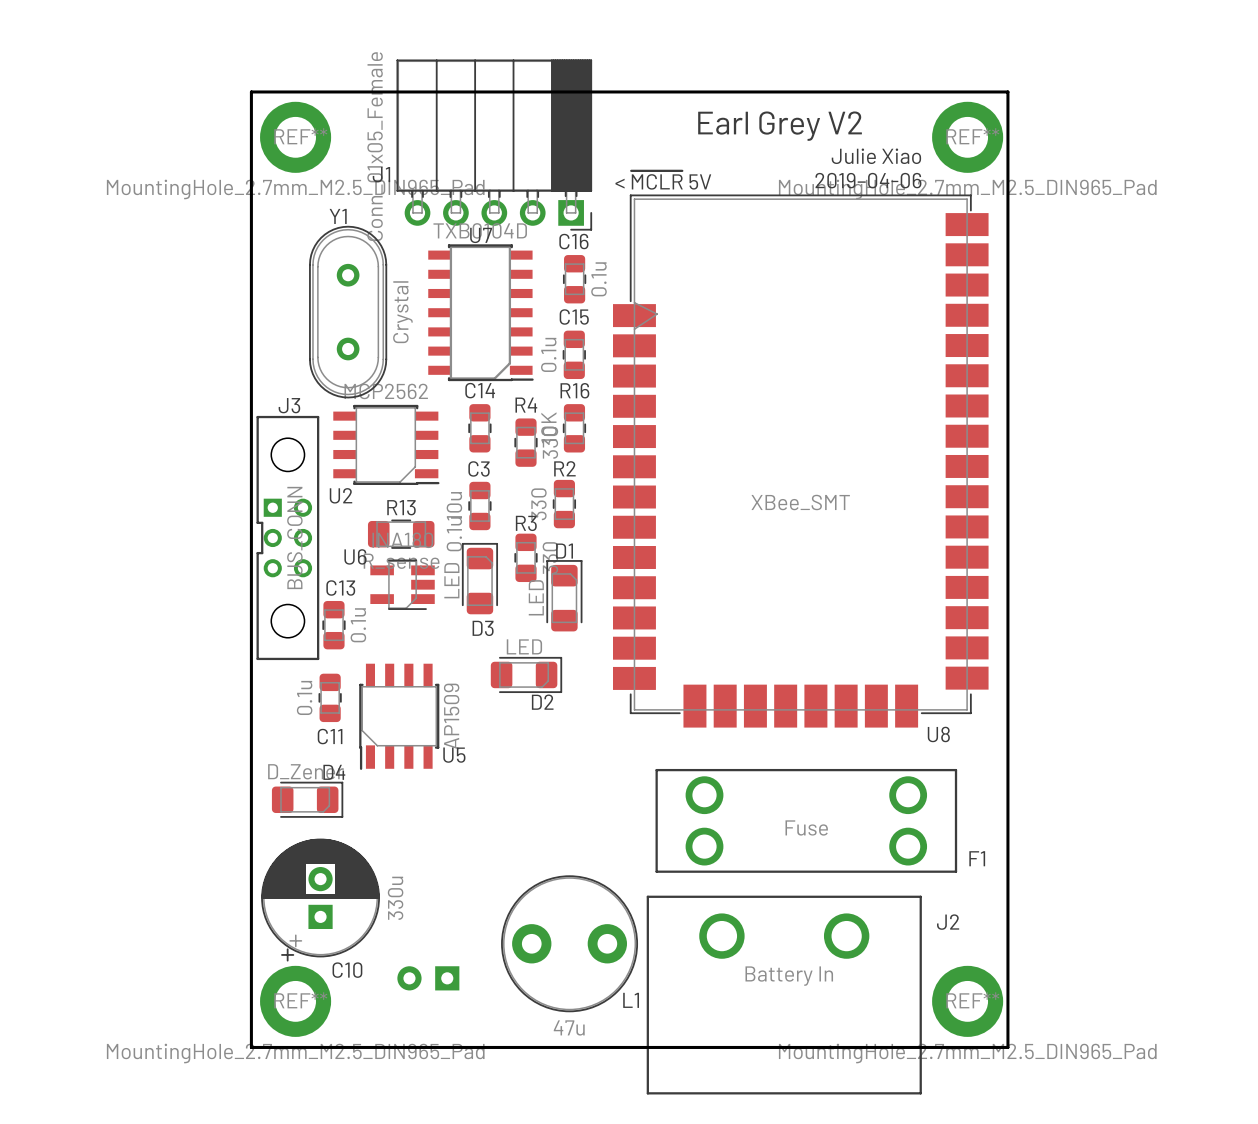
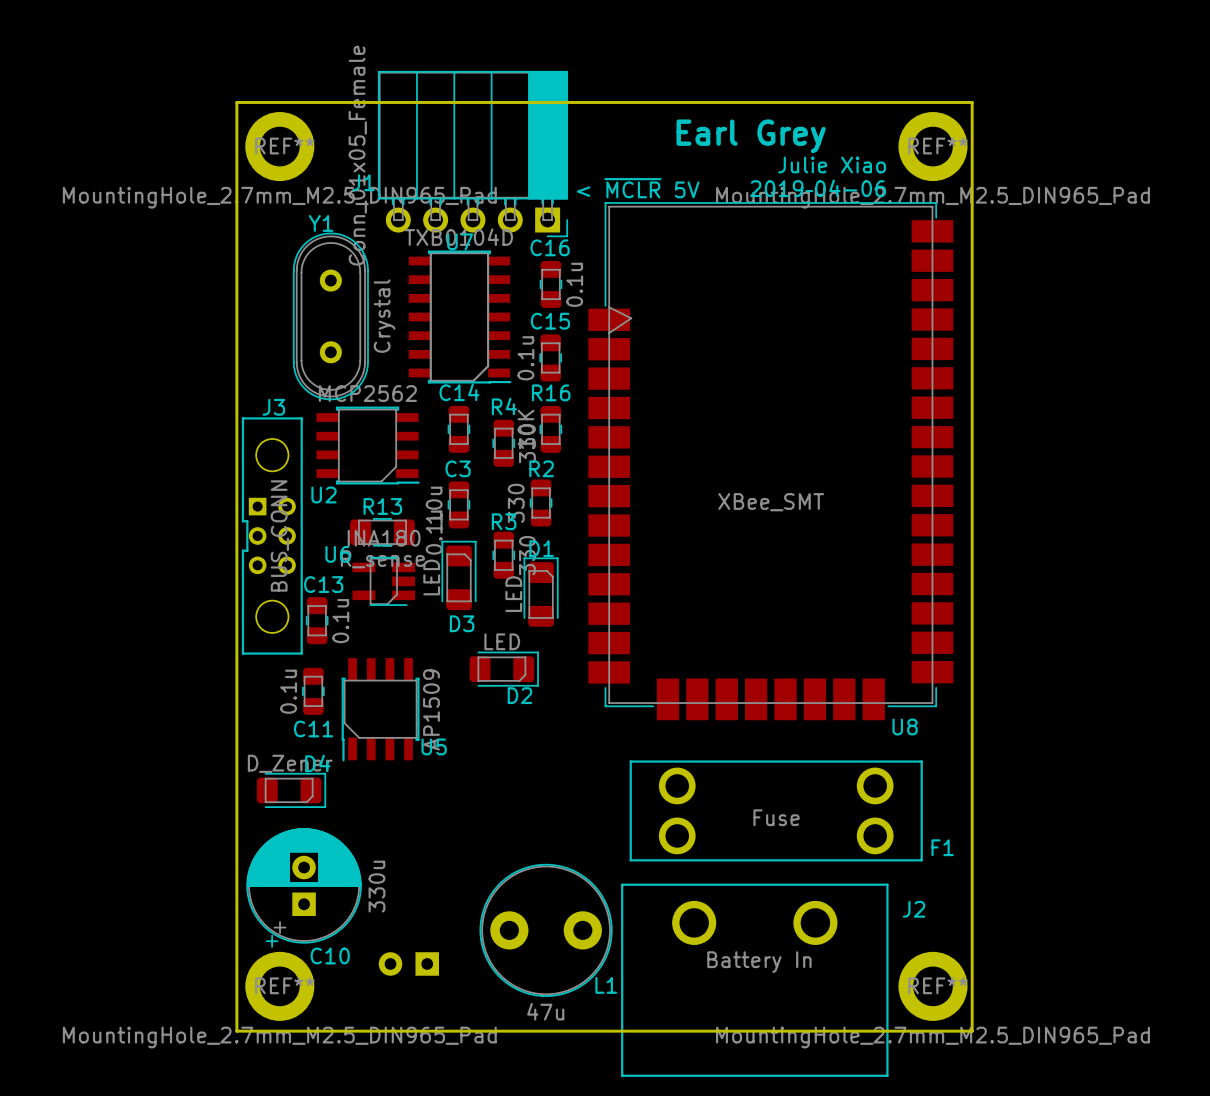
text: Earl Grey V2 (780, 126) -> Earl Grey (751, 136)

